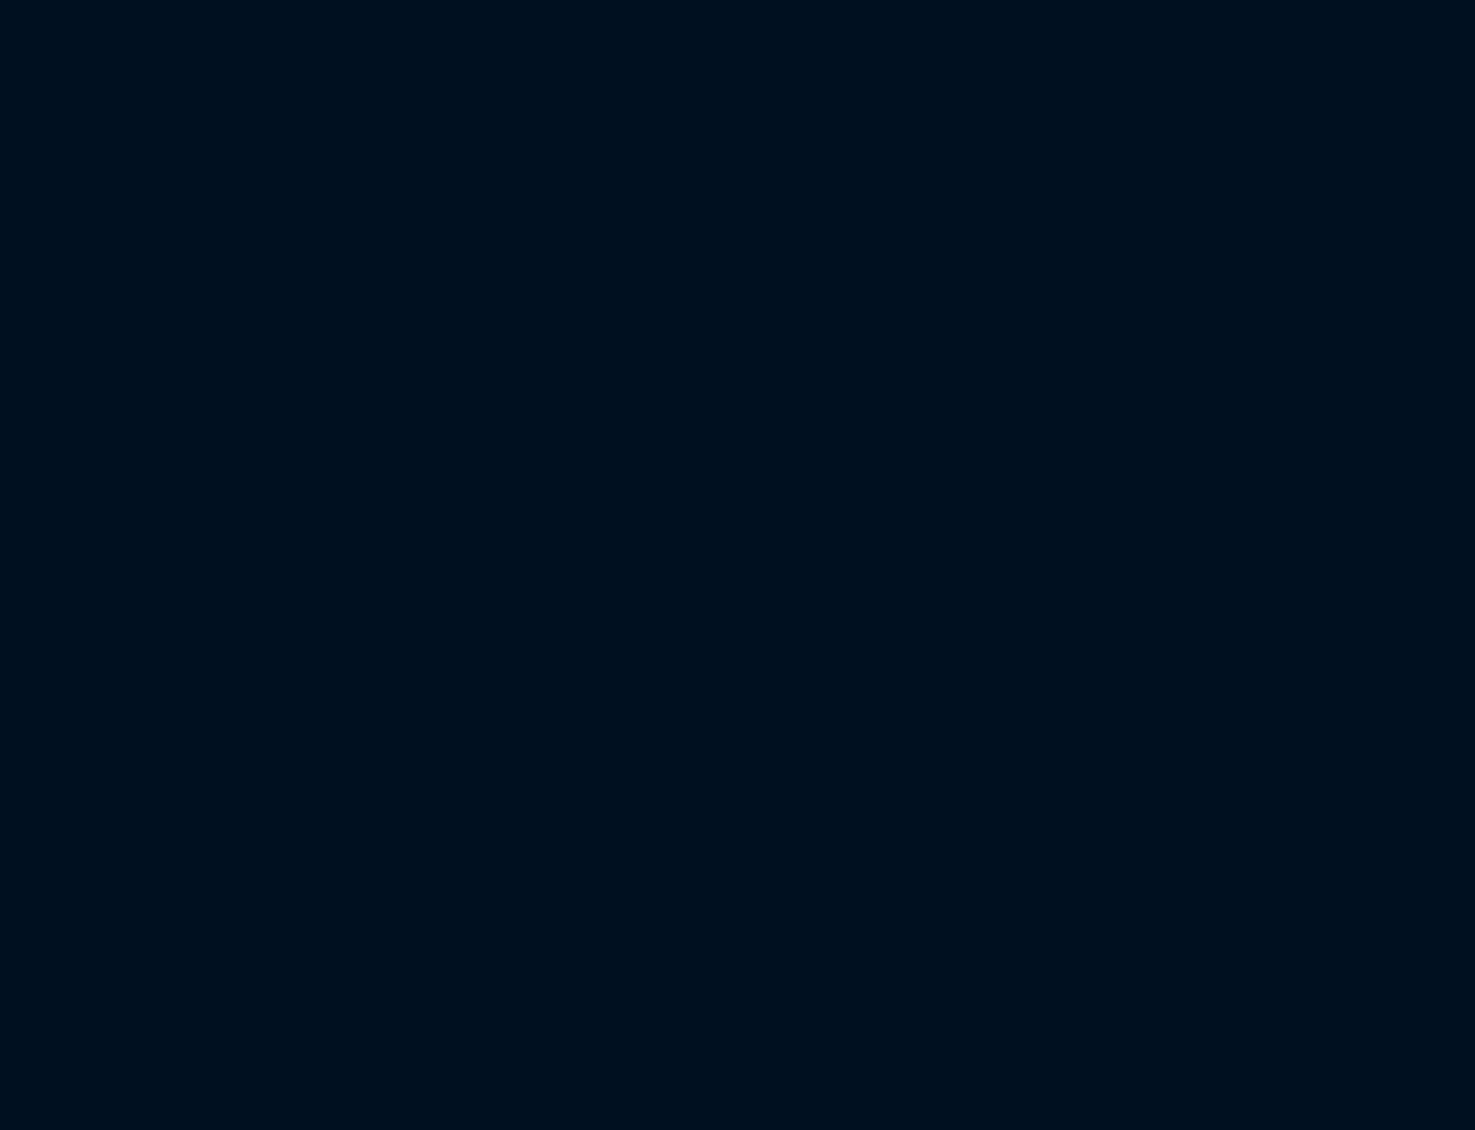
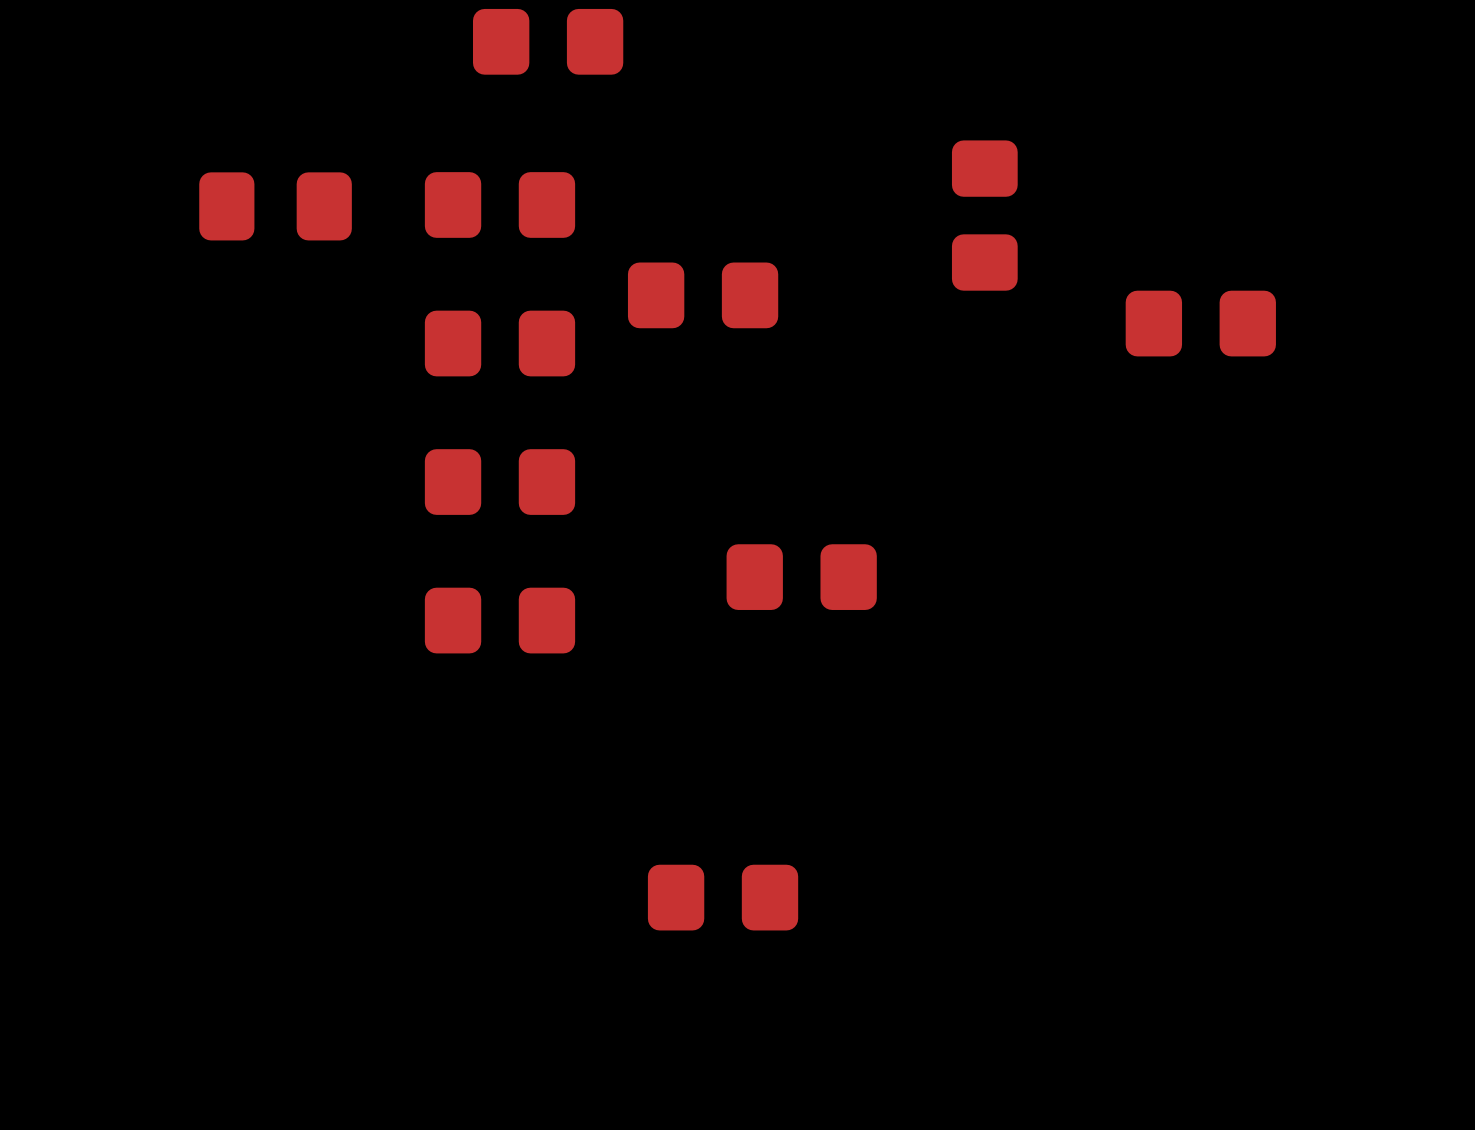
part: none -> (548, 41)
part: none -> (500, 204)
part: none -> (275, 206)
part: none -> (984, 215)
part: none -> (703, 295)
part: none -> (1200, 323)
part: none -> (500, 343)
part: none -> (500, 482)
part: none -> (801, 577)
part: none -> (500, 620)
part: none -> (723, 897)

